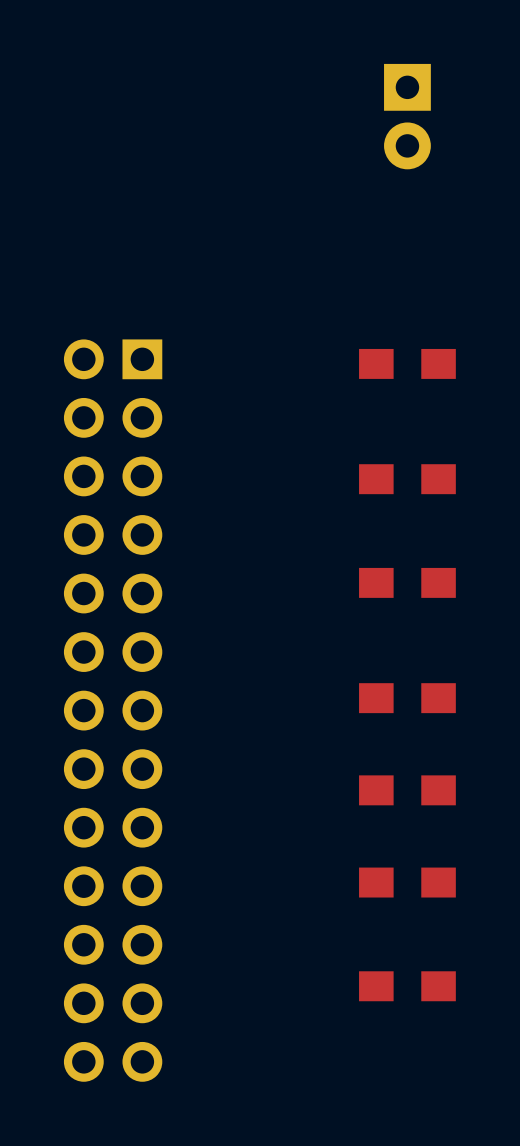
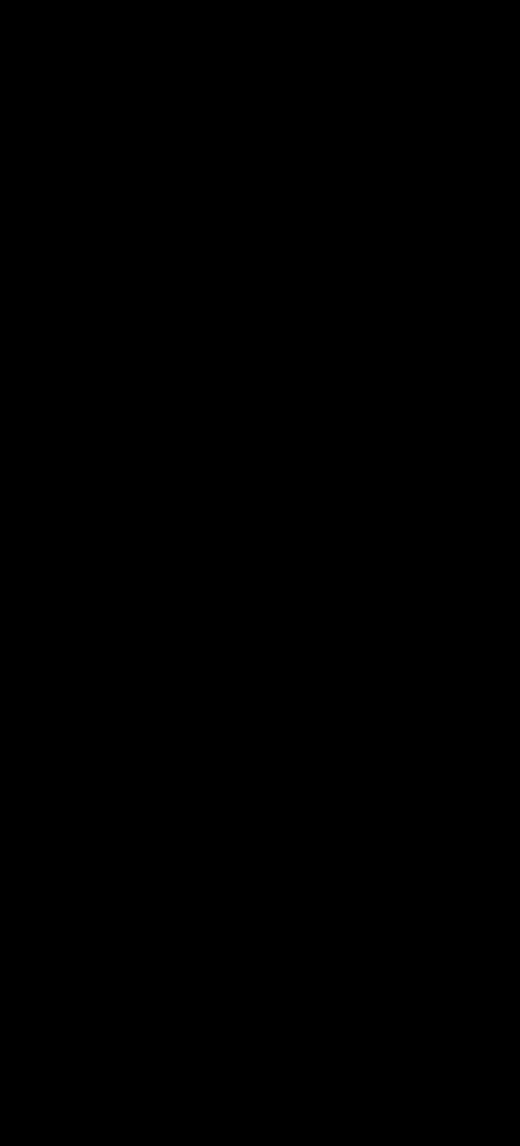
part: (407, 116) -> none
part: (407, 363) -> none
part: (407, 479) -> none
part: (407, 582) -> none
part: (407, 698) -> none
part: (113, 710) -> none
part: (407, 790) -> none
part: (407, 882) -> none
part: (407, 986) -> none

